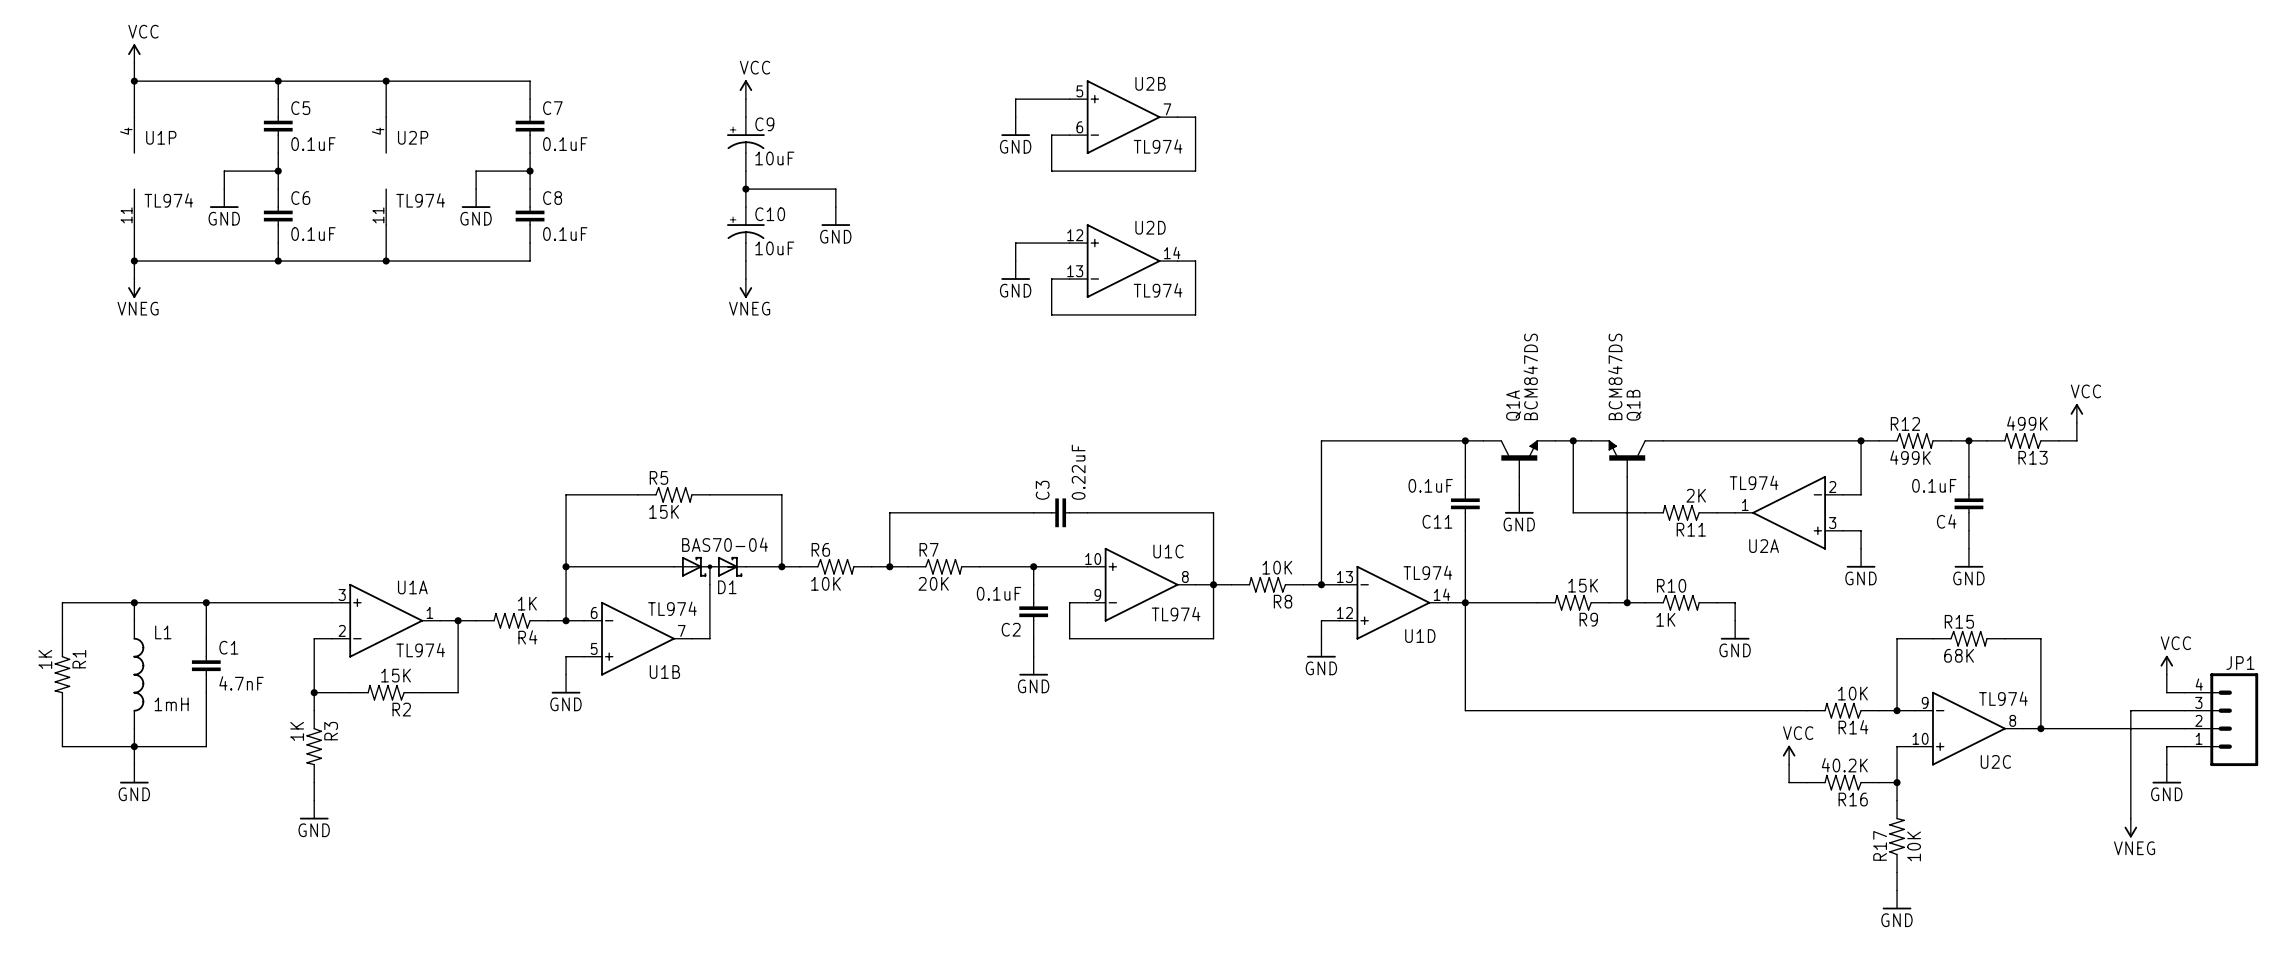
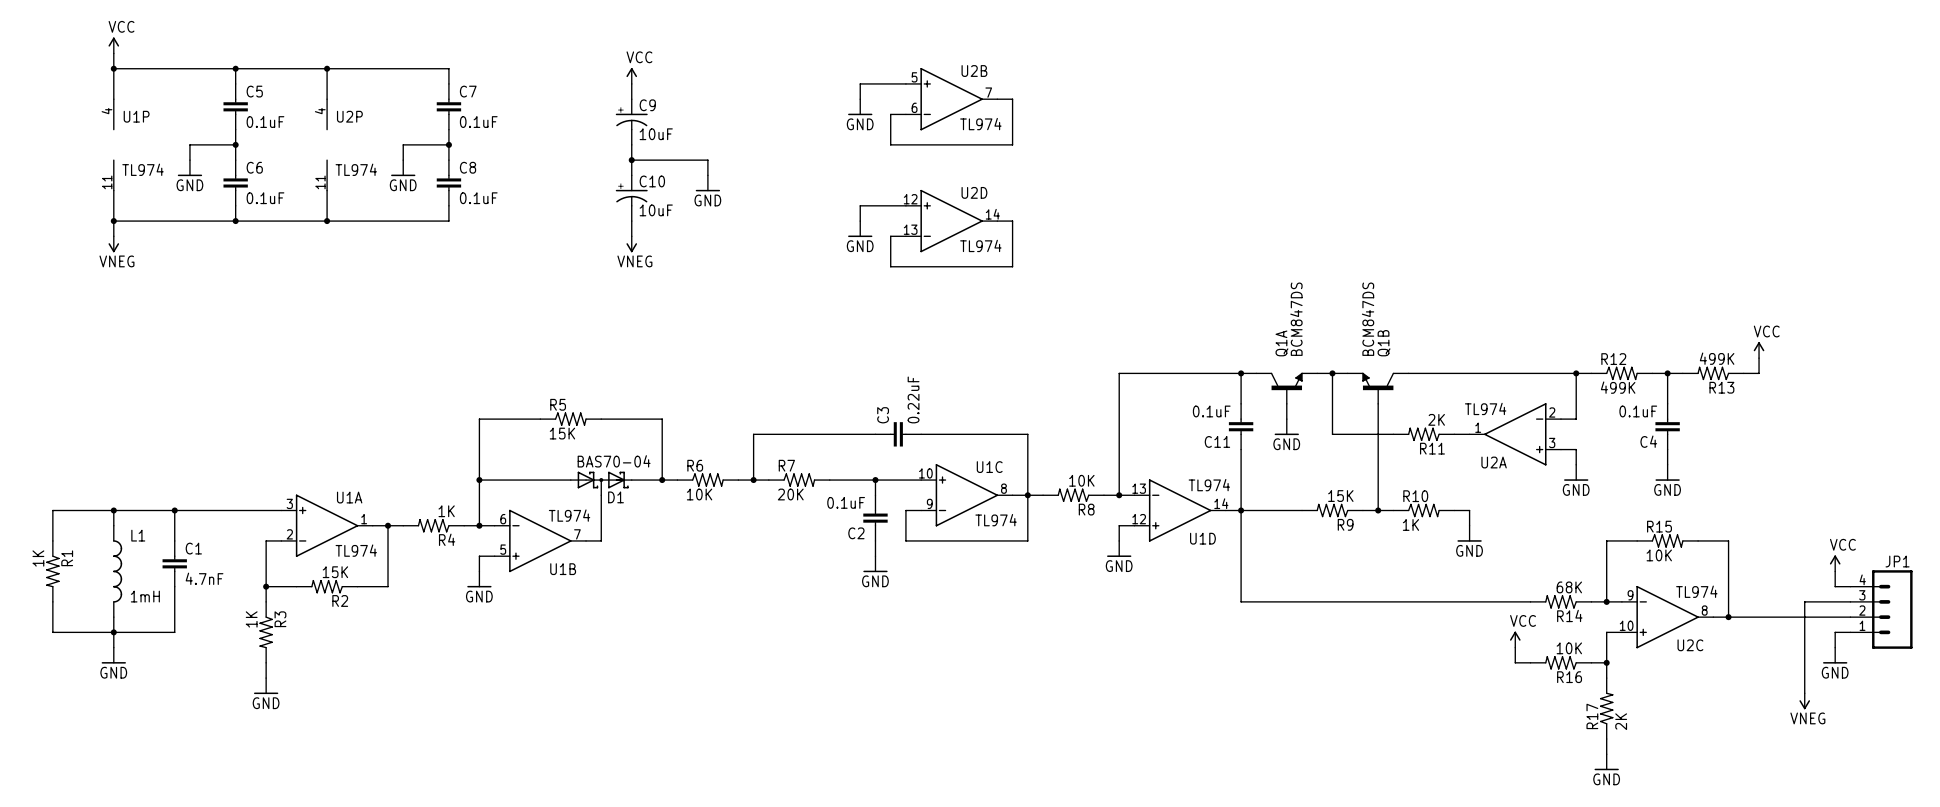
R15 value: 68K (1959, 655) -> 10K (1659, 555)
R14 value: 10K (1852, 693) -> 68K (1569, 587)
R16 value: 40.2K (1844, 765) -> 10K (1569, 648)
R17 value: 10K (1914, 846) -> 2K (1621, 721)

